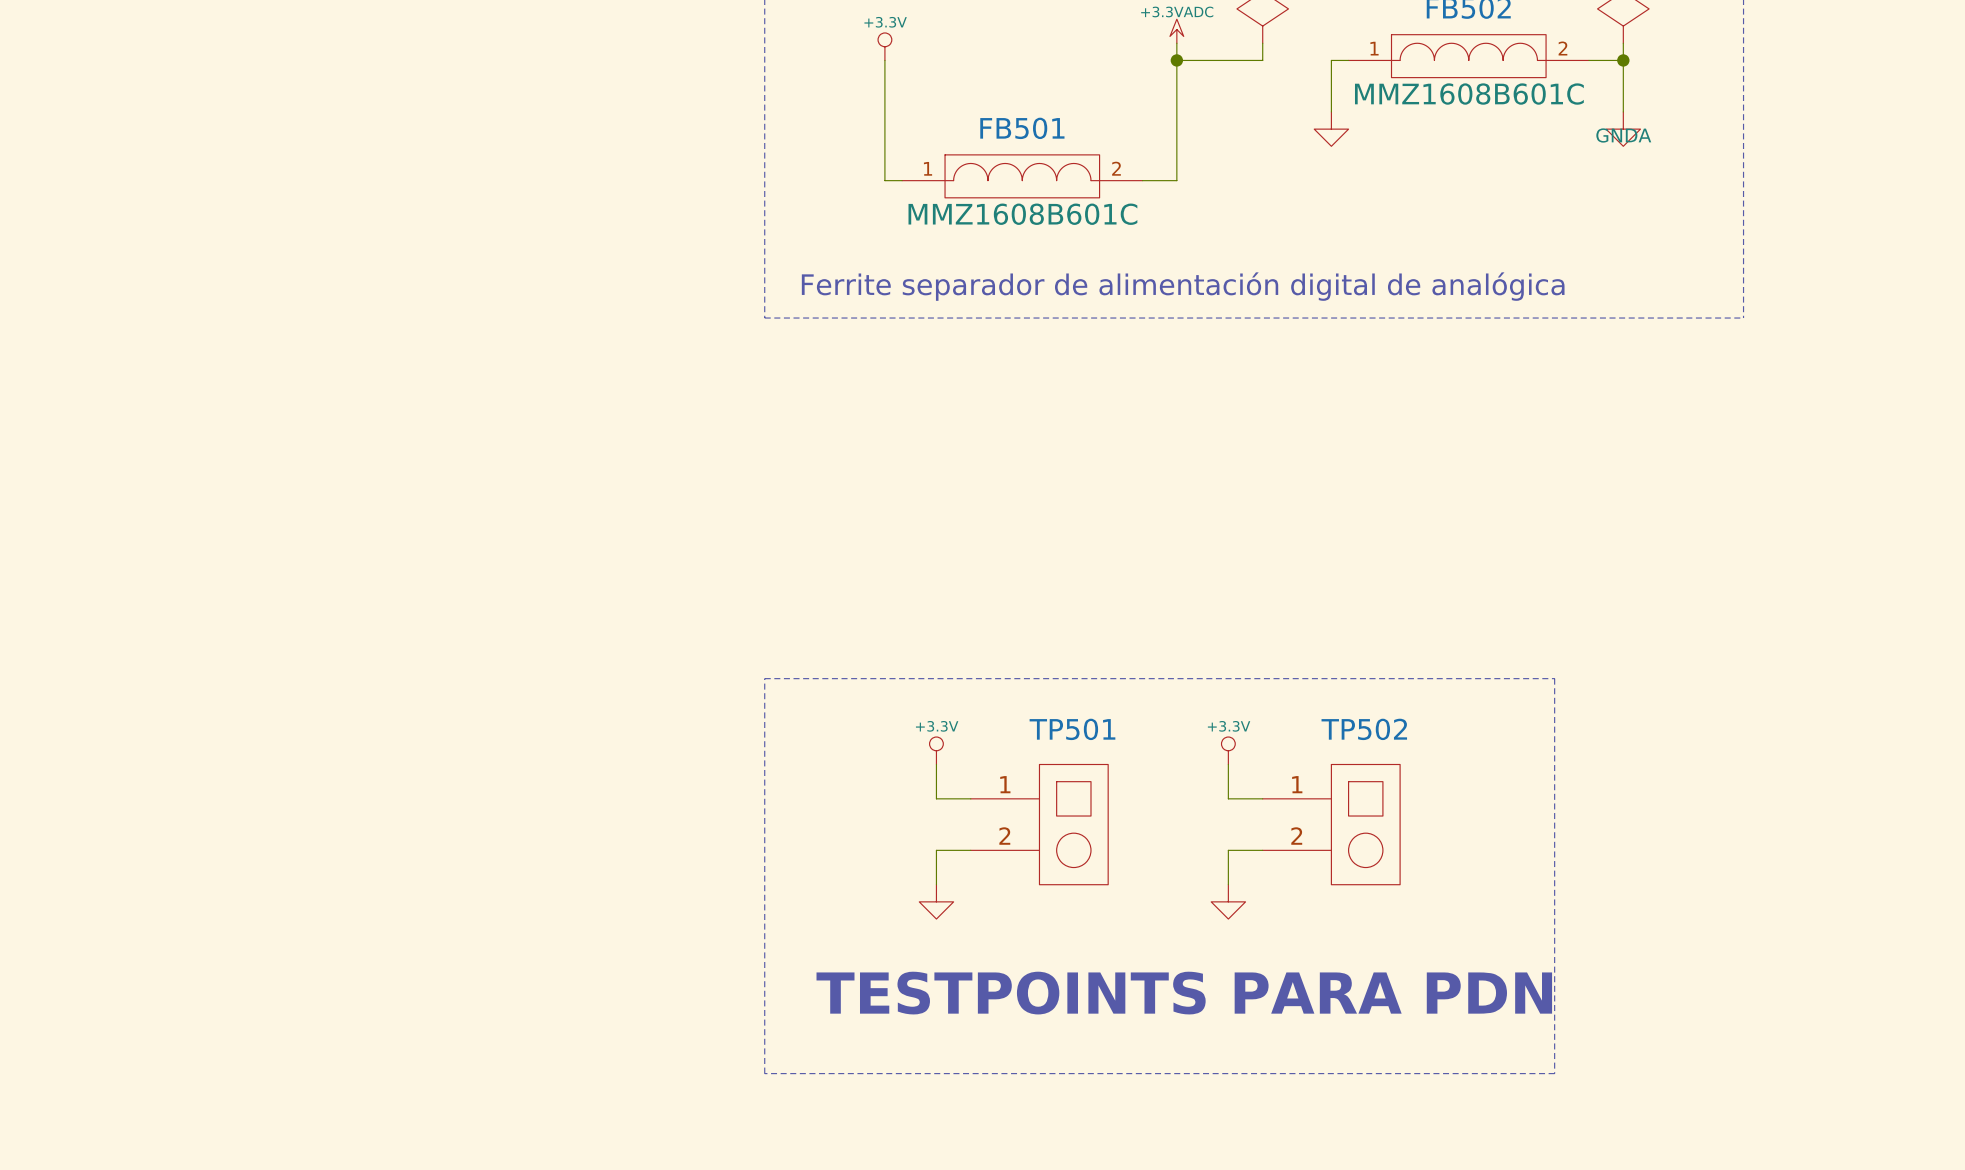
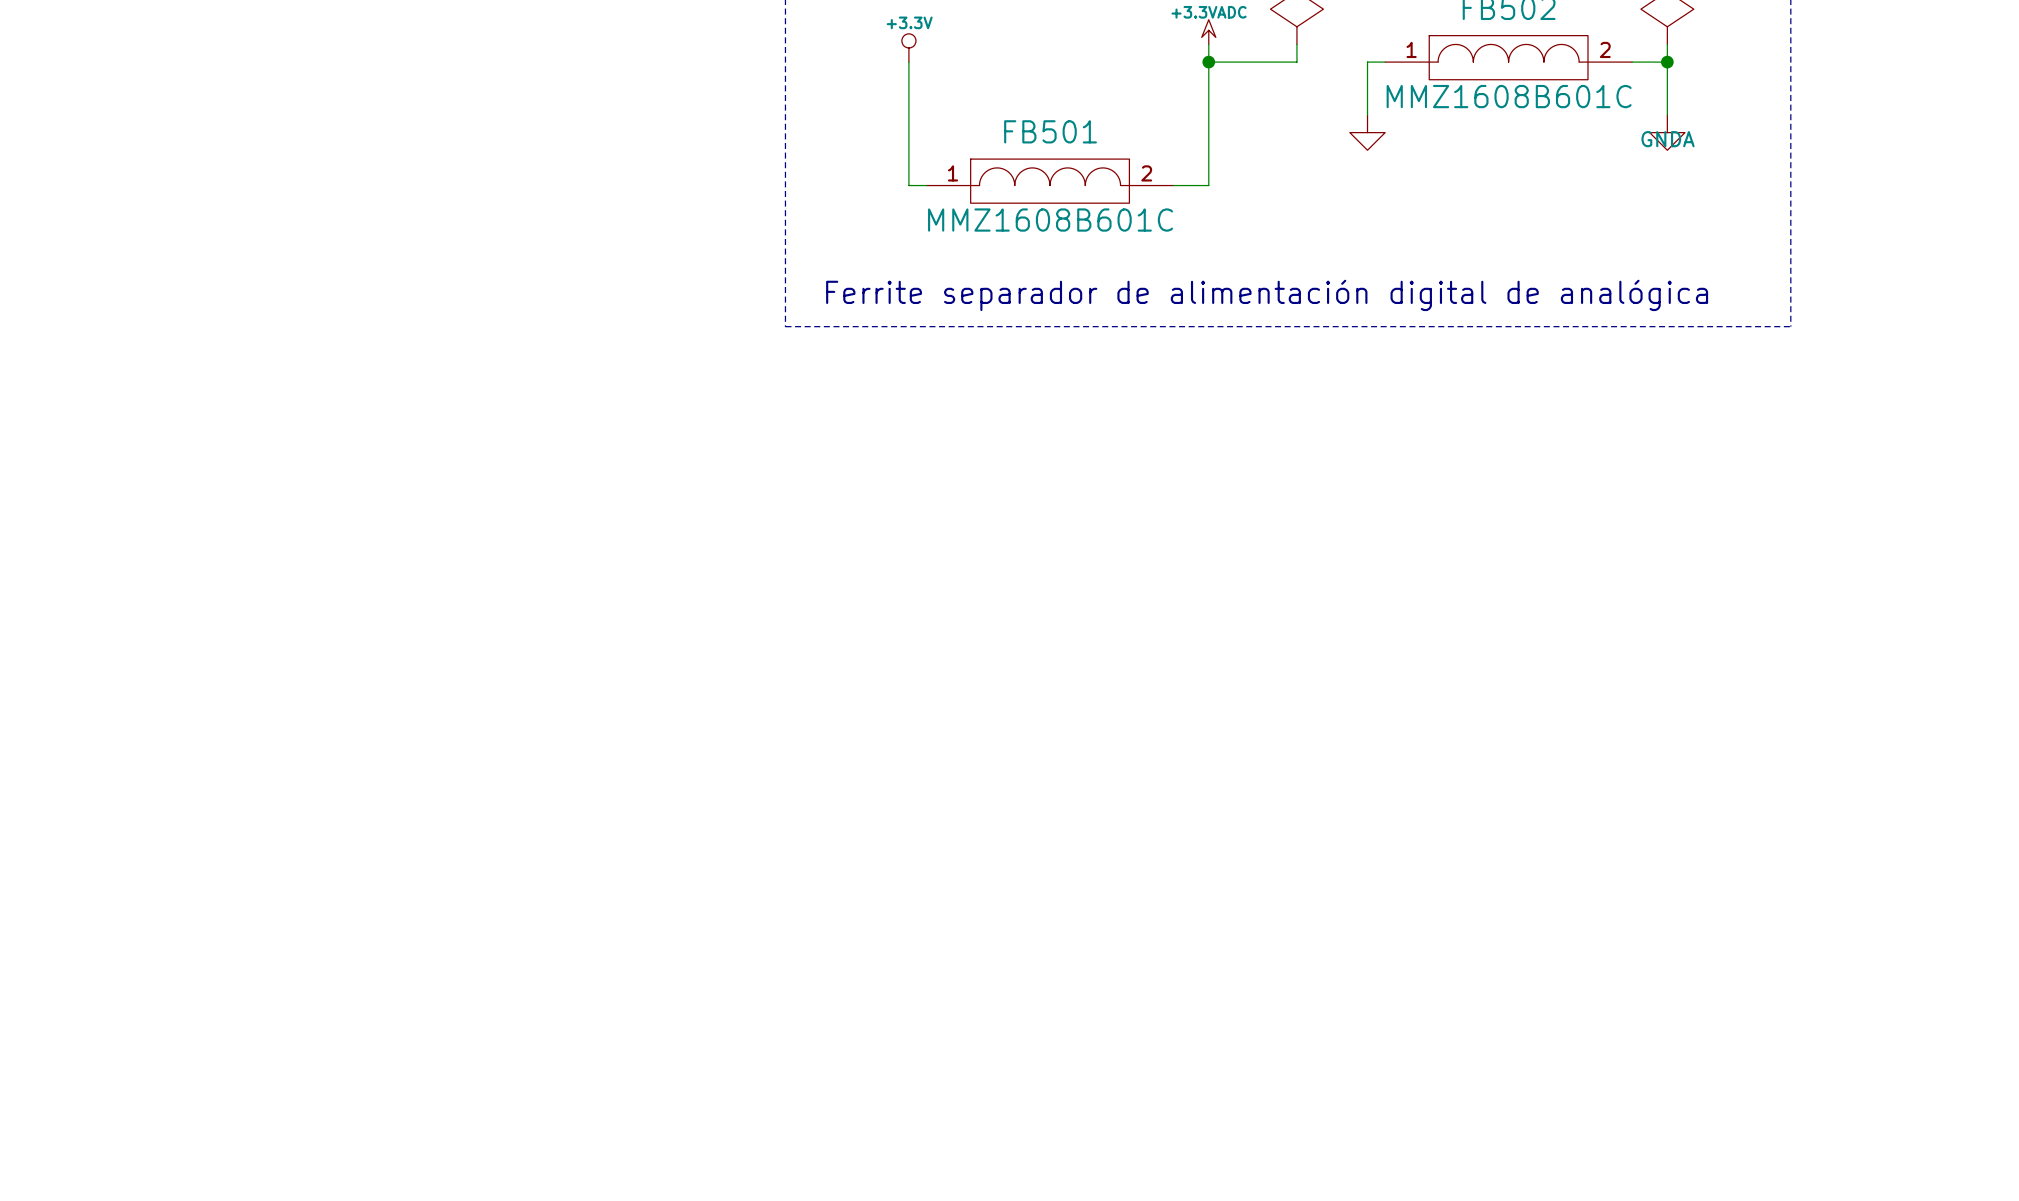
line: (764, 678) (1554, 678) (1554, 1073) (764, 1073) (764, 678) -> none
power symbol: +3.3V (936, 750) -> none
power symbol: +3.3V (1228, 750) -> none
wire: (936, 764) (936, 798) (970, 798) -> none
wire: (1228, 764) (1228, 798) (1262, 798) -> none
TP501: (1039, 824) -> none
TP502: (1331, 824) -> none
wire: (970, 850) (936, 850) (936, 884) -> none
wire: (1262, 850) (1228, 850) (1228, 884) -> none
power symbol: (936, 901) -> none
power symbol: (1228, 901) -> none
text: TESTPOINTS PARA PDN (1184, 993) -> none

